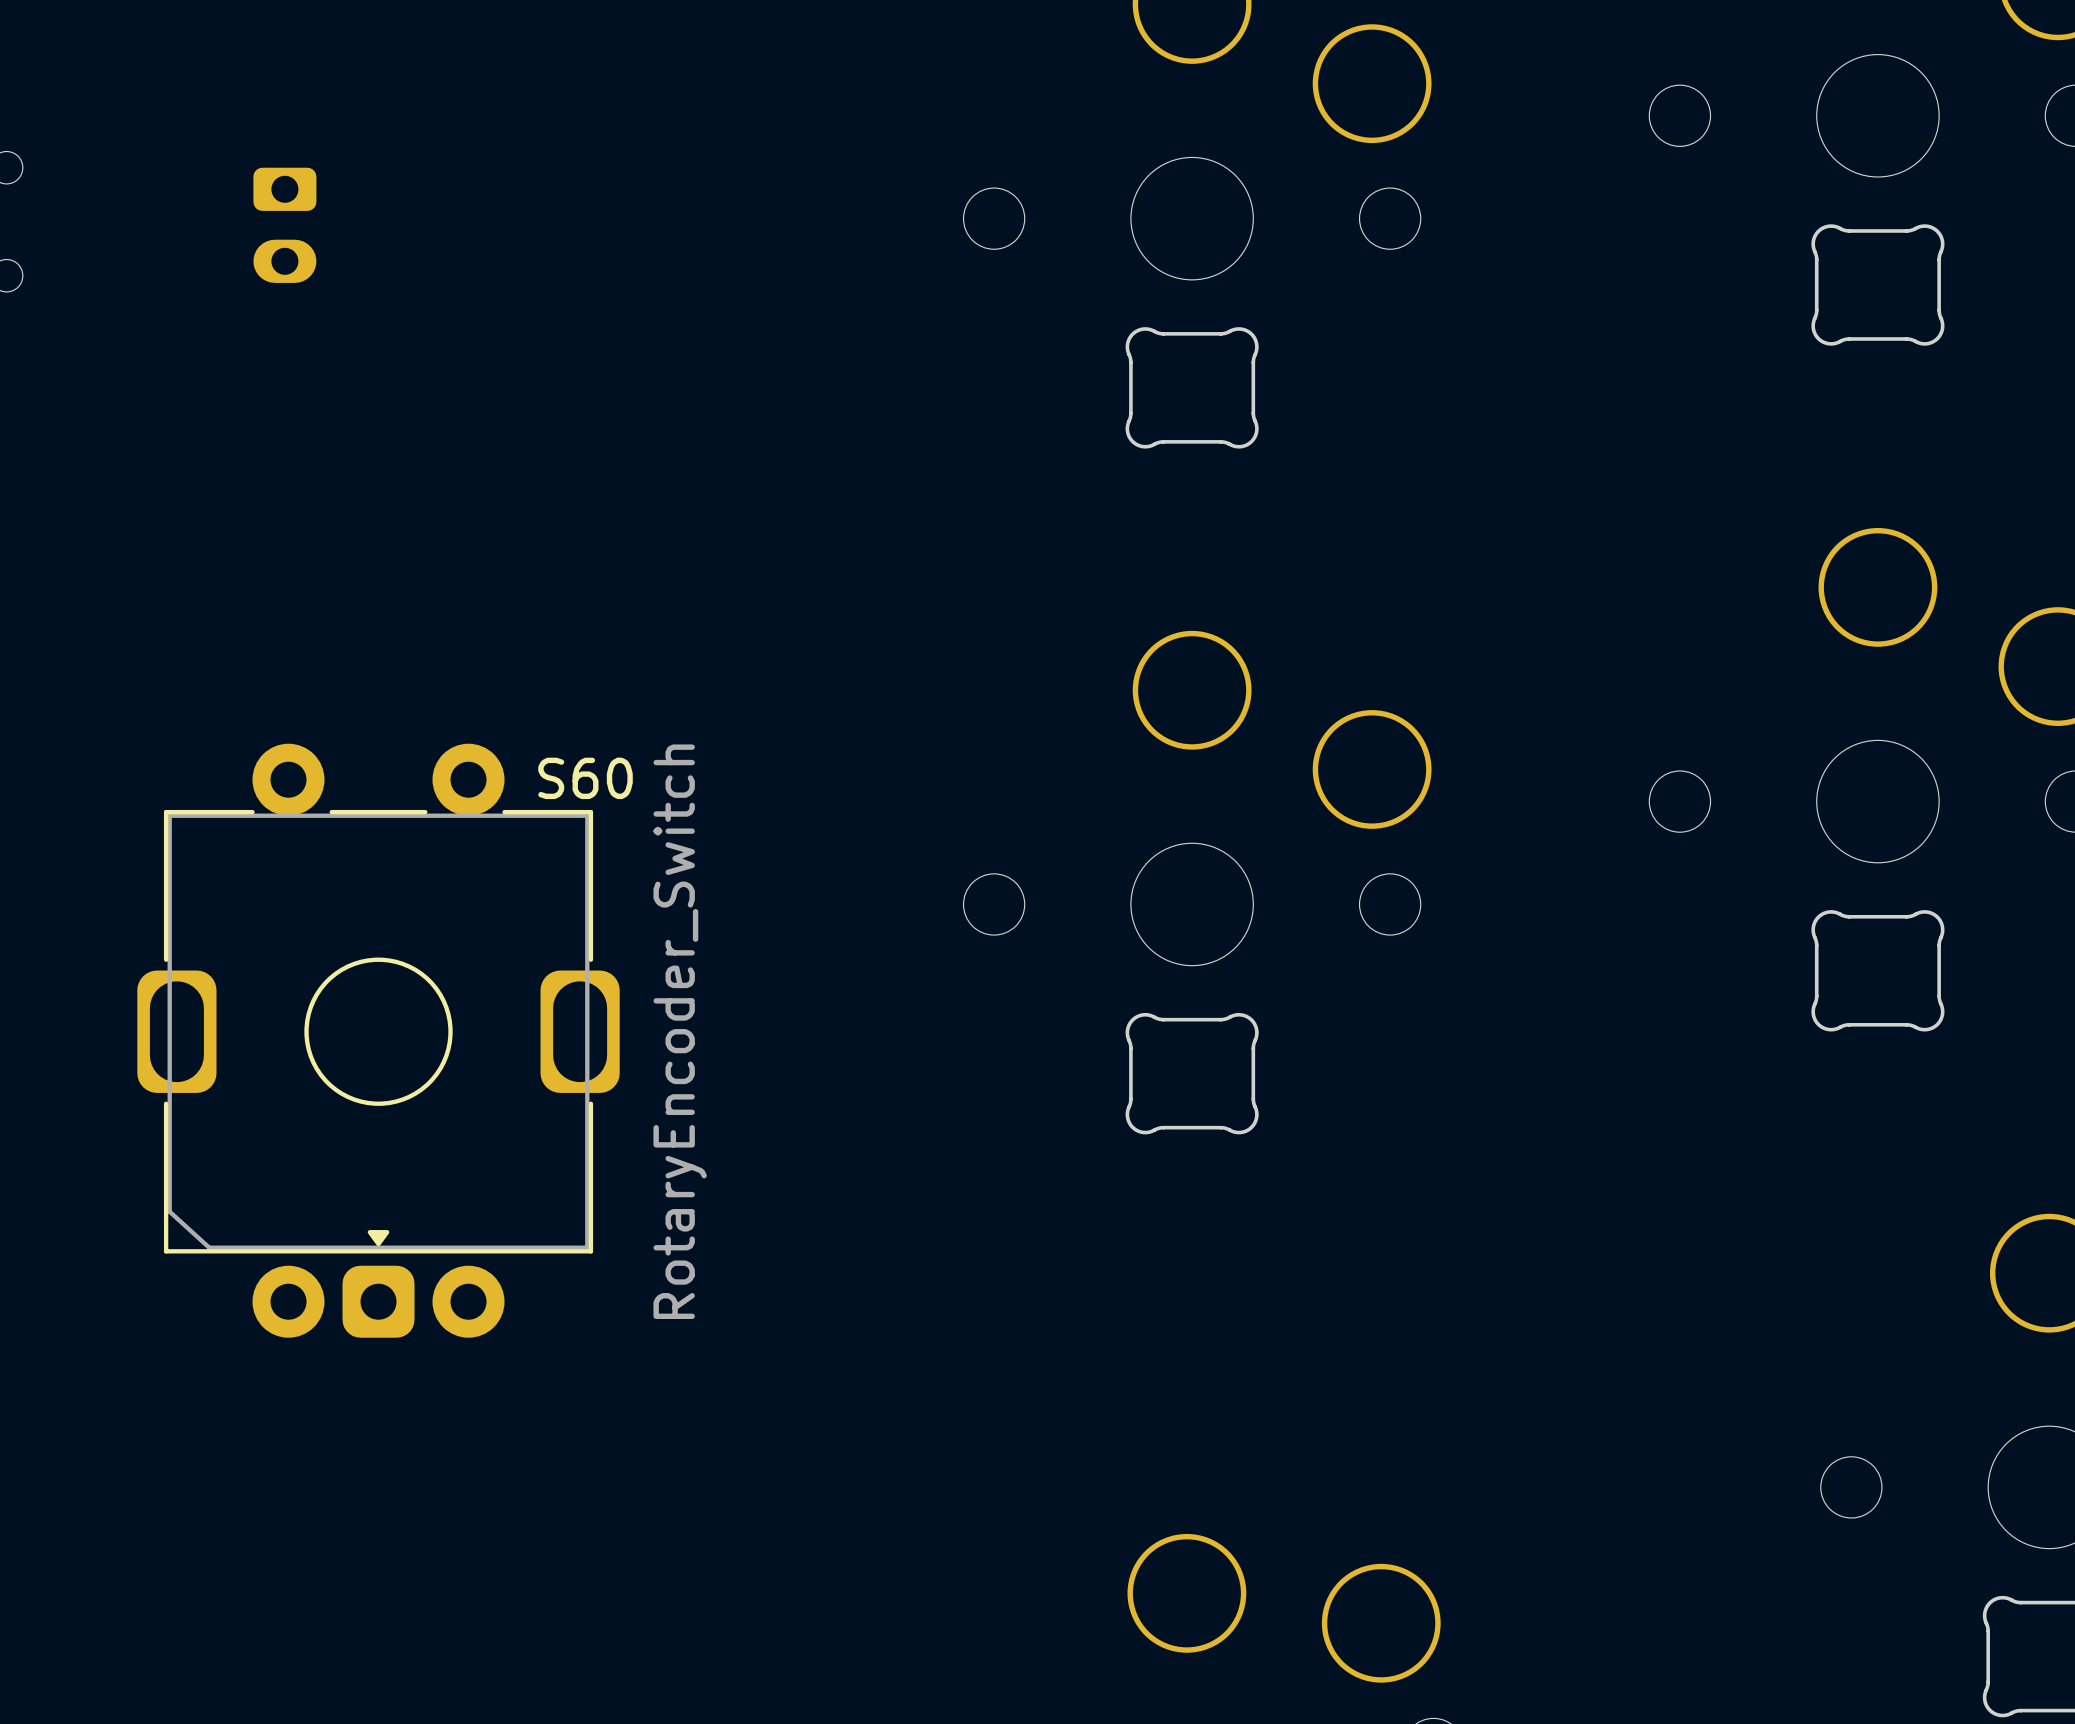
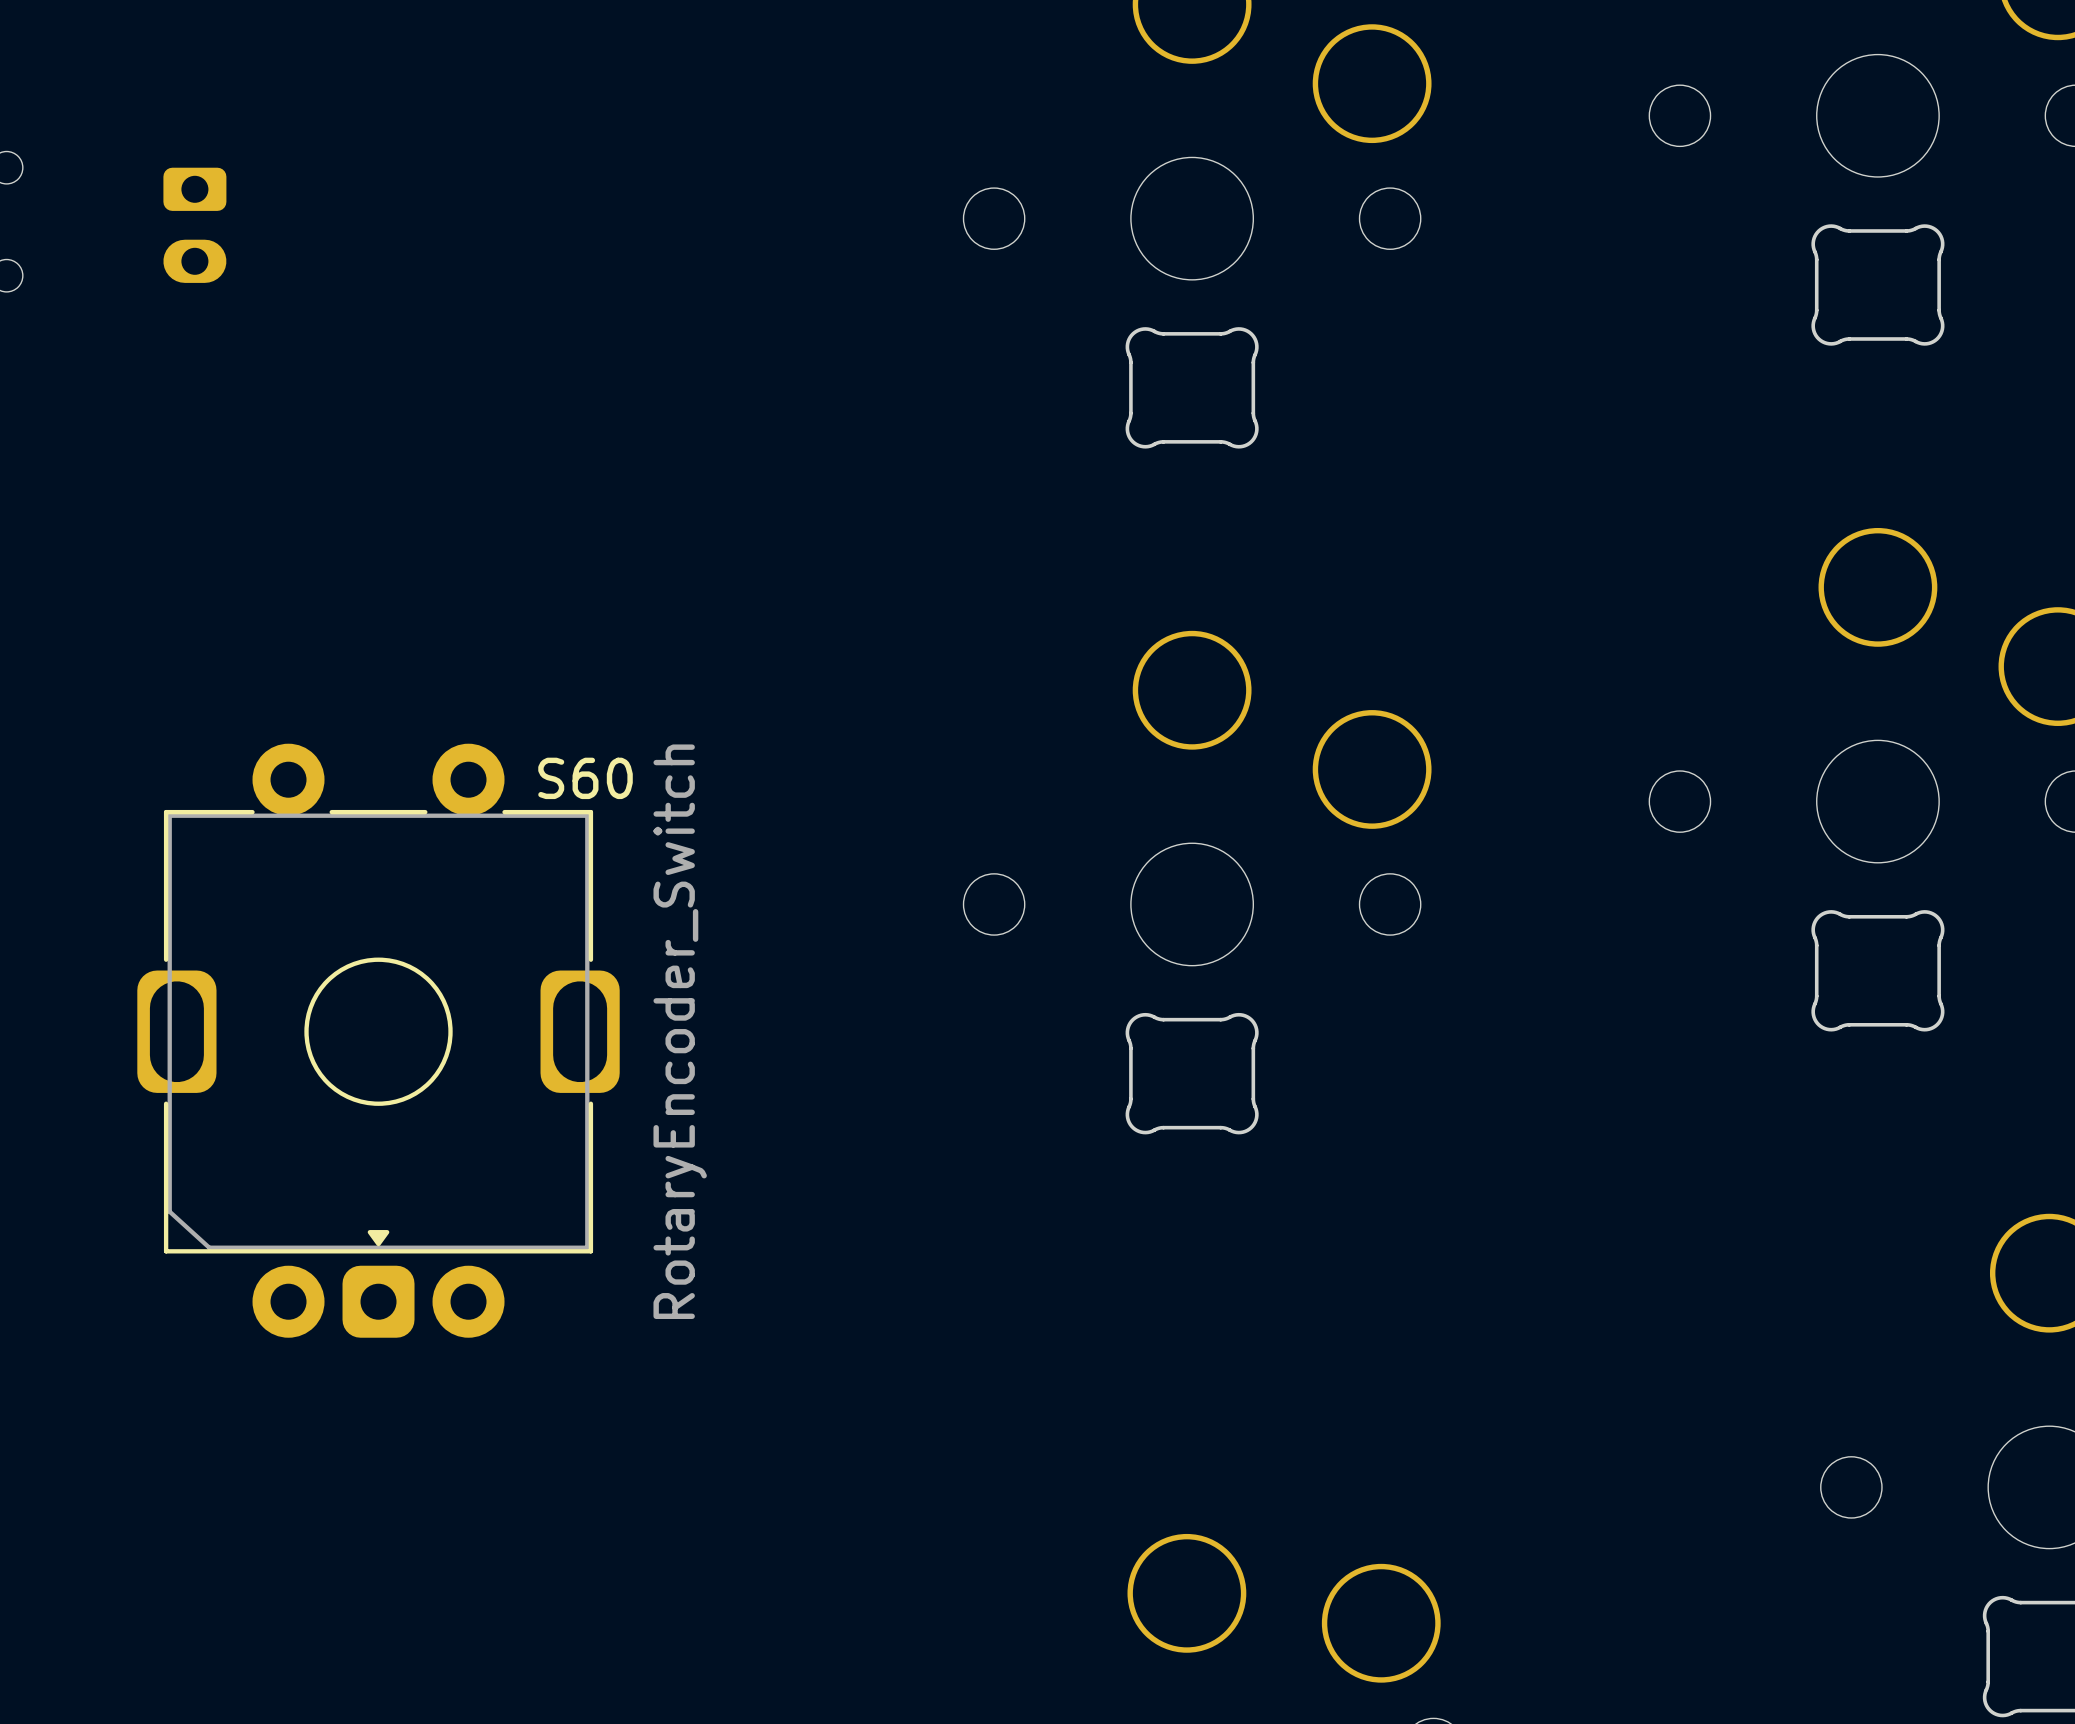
part position: (284, 225) -> (194, 225)

